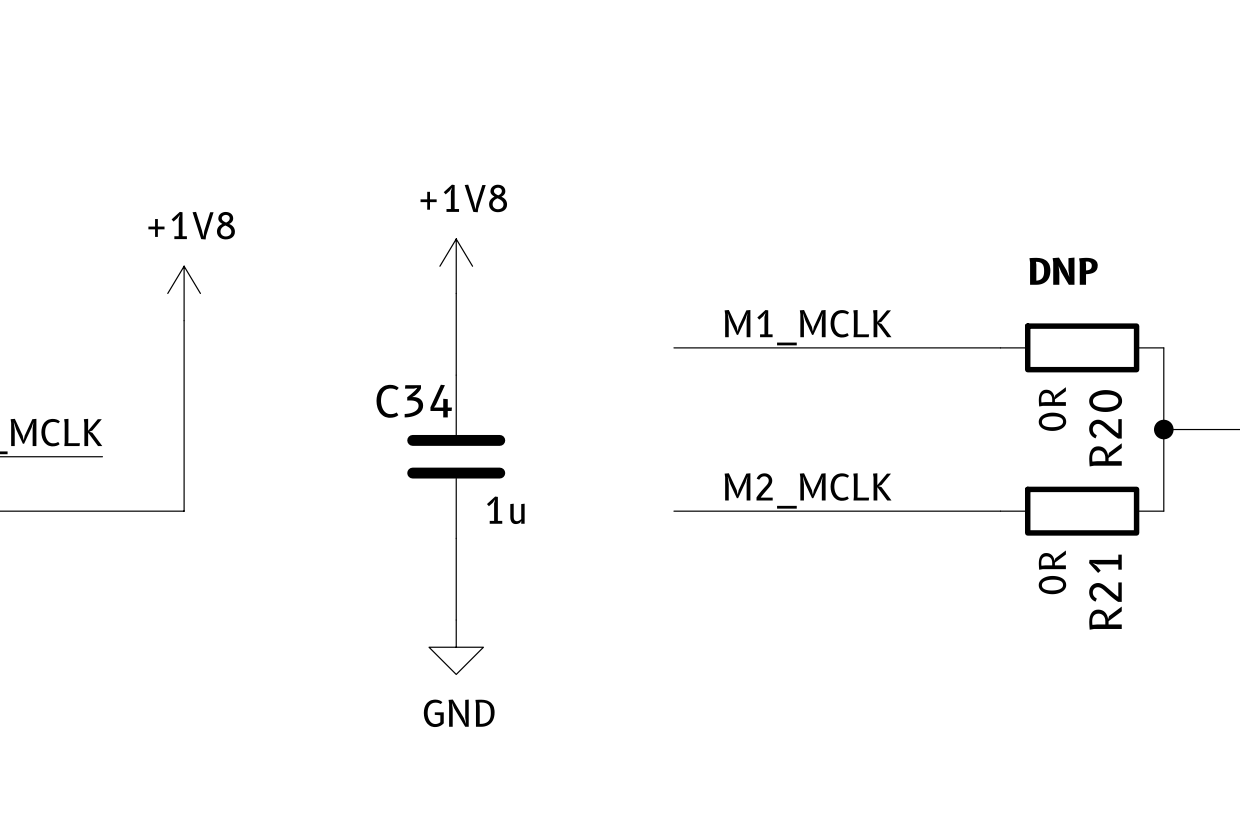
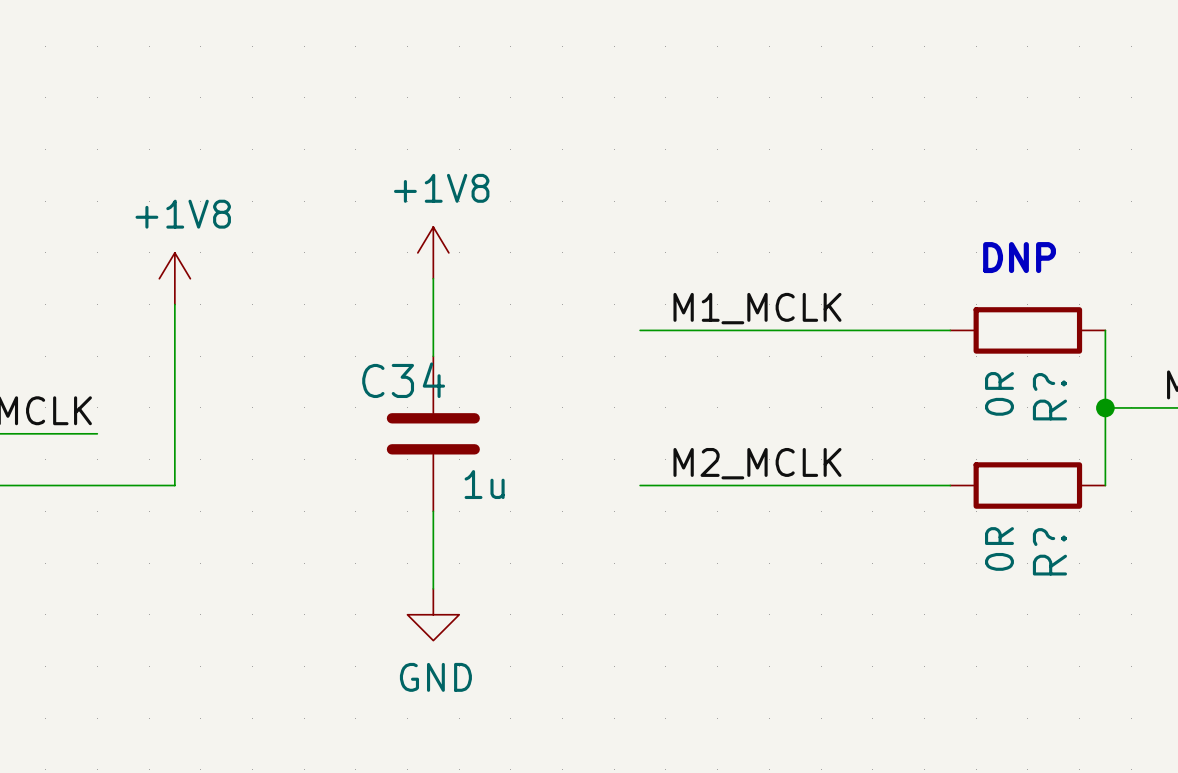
R20 name: R20 (1105, 428) -> R? (1049, 396)
R21 name: R21 (1105, 592) -> R? (1049, 551)

